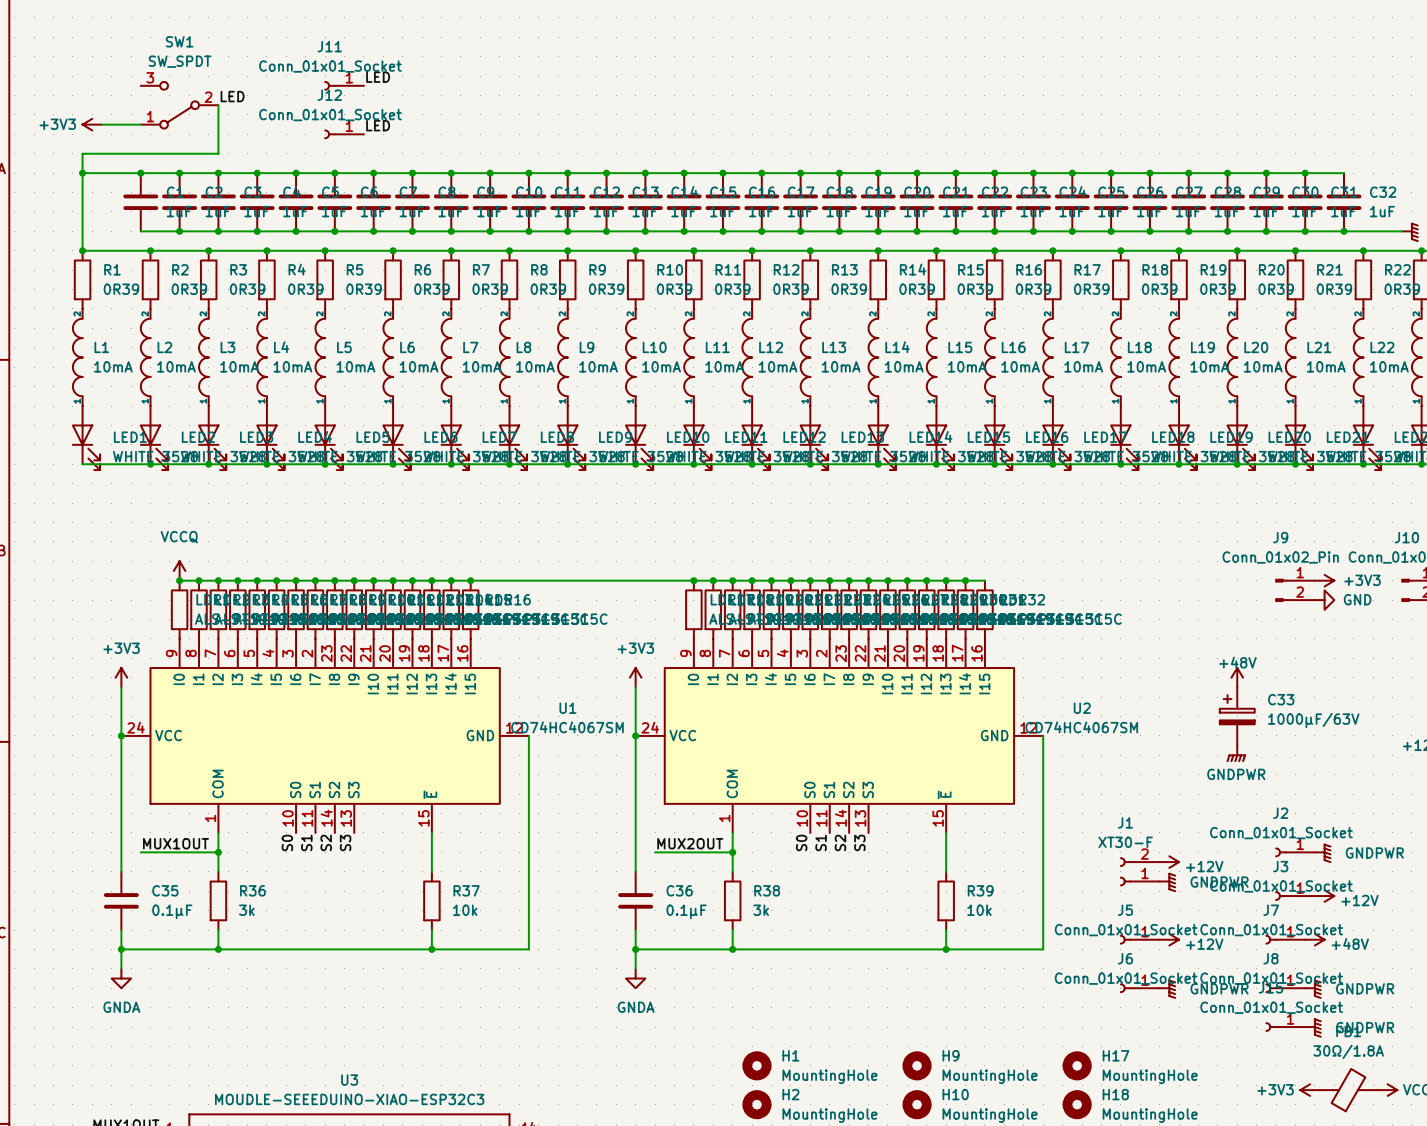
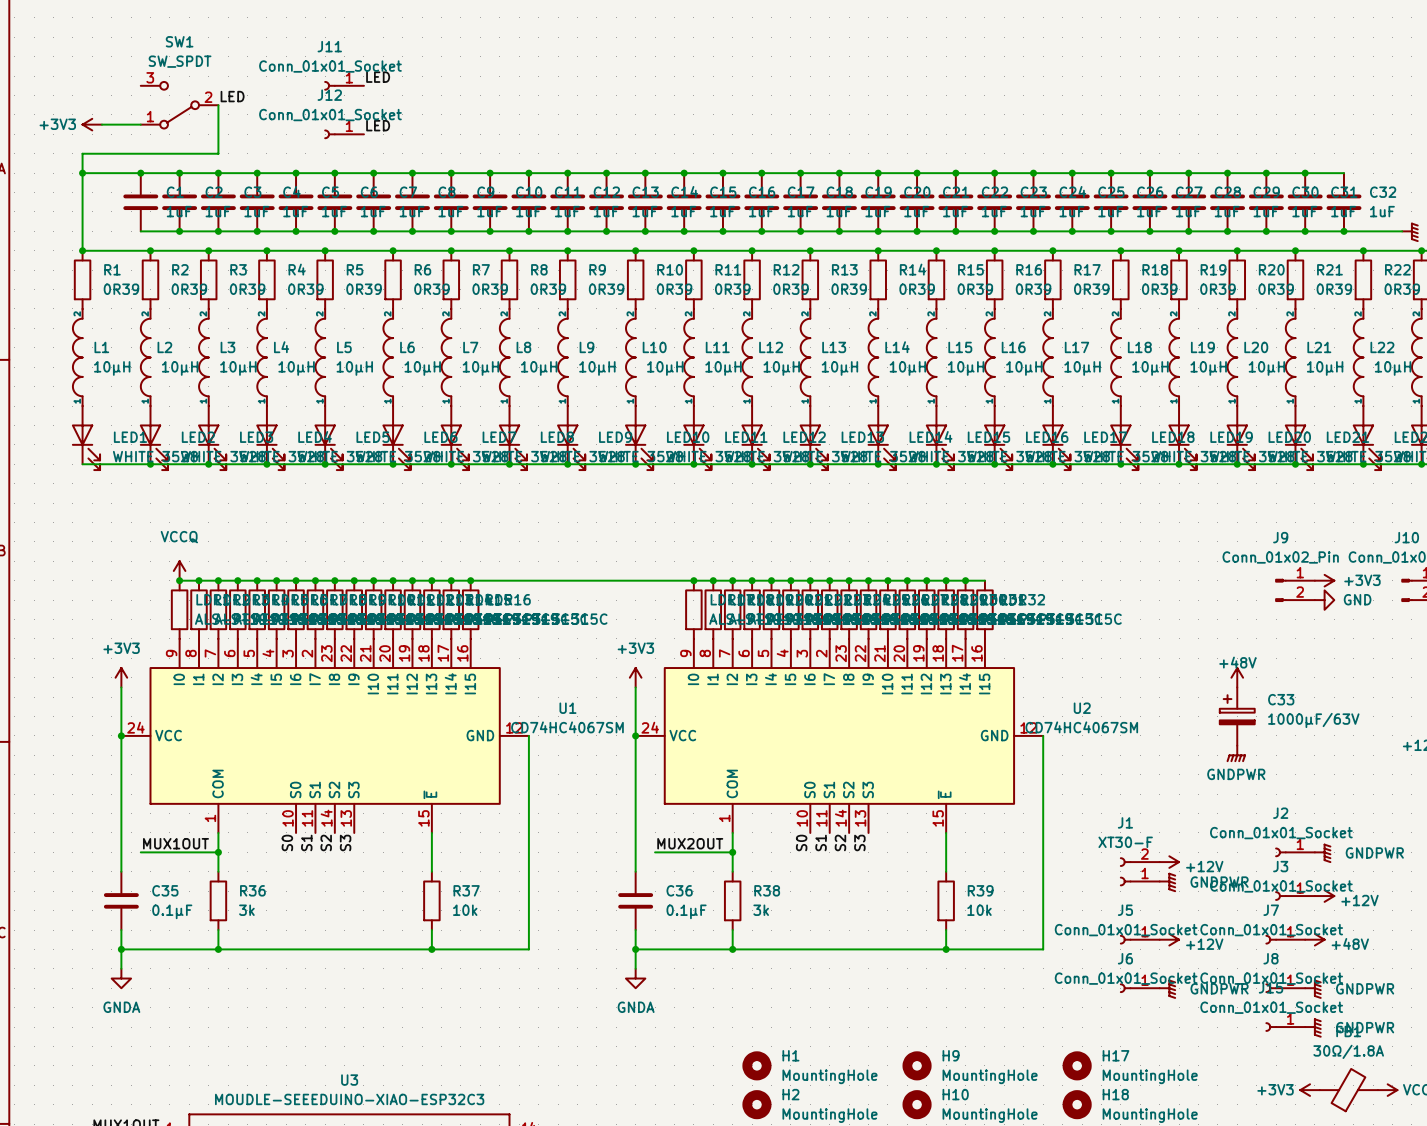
L1 value: 10mA (113, 366) -> 10µH (112, 368)
L2 value: 10mA (176, 366) -> 10µH (180, 368)
L3 value: 10mA (239, 366) -> 10µH (238, 368)
L4 value: 10mA (292, 366) -> 10µH (296, 368)
L5 value: 10mA (355, 366) -> 10µH (354, 368)
L6 value: 10mA (419, 366) -> 10µH (422, 368)
L7 value: 10mA (482, 366) -> 10µH (480, 368)
L8 value: 10mA (535, 366) -> 10µH (539, 368)
L9 value: 10mA (598, 366) -> 10µH (597, 368)
L10 value: 10mA (661, 366) -> 10µH (665, 368)
L11 value: 10mA (724, 366) -> 10µH (723, 368)
L12 value: 10mA (778, 366) -> 10µH (781, 368)
L13 value: 10mA (841, 366) -> 10µH (839, 368)
L14 value: 10mA (904, 366) -> 10µH (907, 368)
L15 value: 10mA (967, 366) -> 10µH (966, 368)
L16 value: 10mA (1020, 366) -> 10µH (1024, 368)
L17 value: 10mA (1083, 366) -> 10µH (1082, 368)
L18 value: 10mA (1146, 366) -> 10µH (1150, 368)
L19 value: 10mA (1209, 366) -> 10µH (1208, 368)
L20 value: 10mA (1263, 366) -> 10µH (1266, 368)
L21 value: 10mA (1326, 366) -> 10µH (1325, 368)
L22 value: 10mA (1389, 366) -> 10µH (1393, 368)

